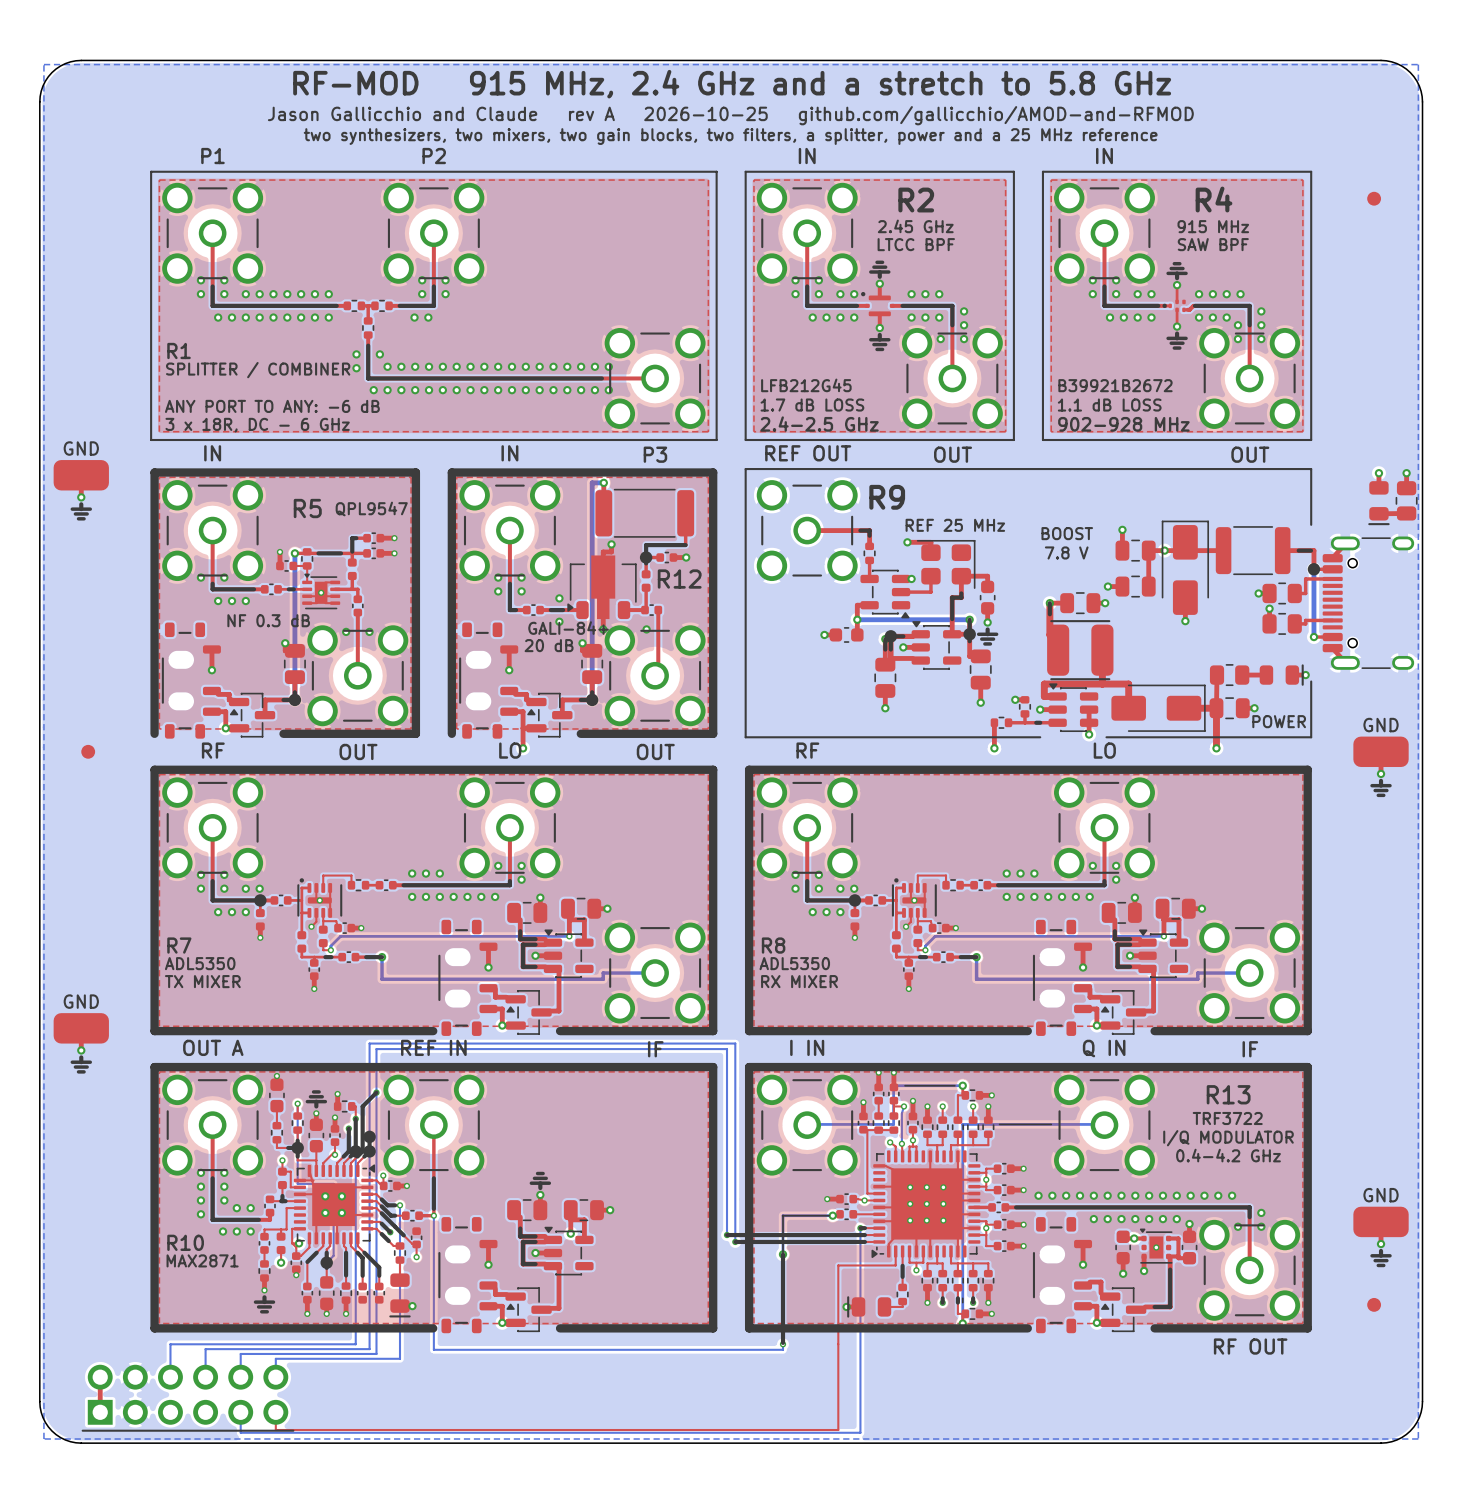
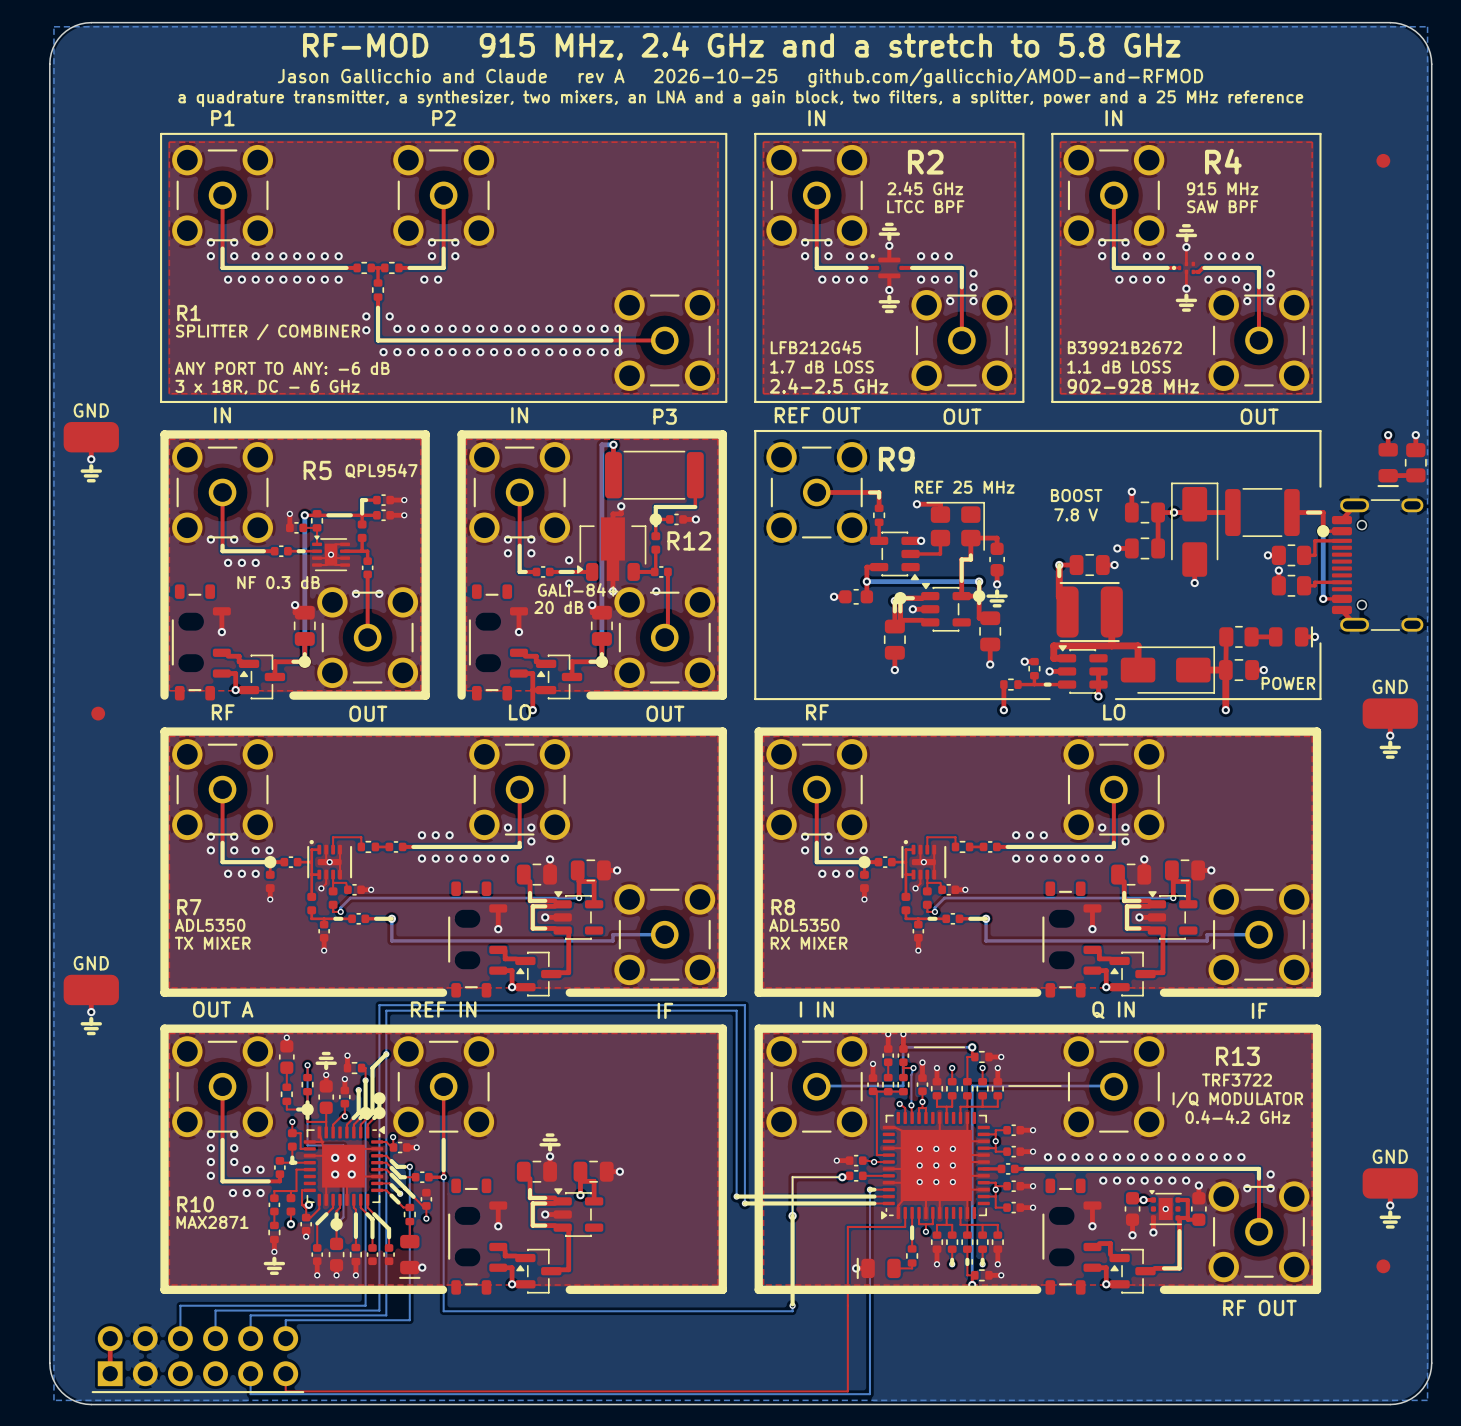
text: two synthesizers, two mixers, two gain blocks, two filters, a splitter, power and a 25 MHz reference (730, 136) -> a quadrature transmitter, a synthesizer, two mixers, an LNA and a gain block, two filters, a splitter, power and a 25 MHz reference (740, 98)

